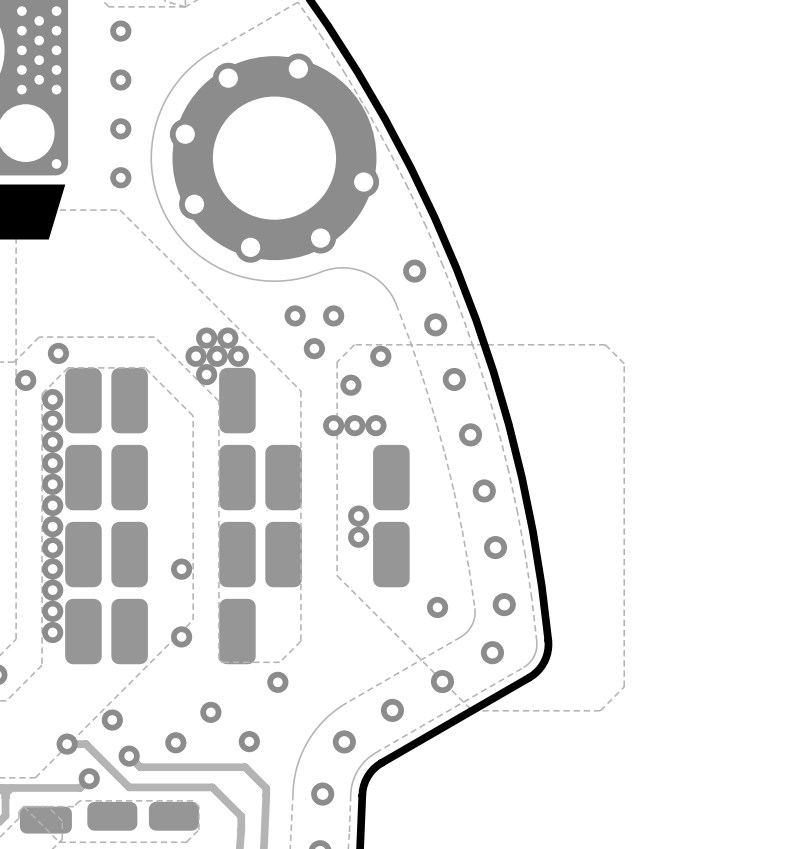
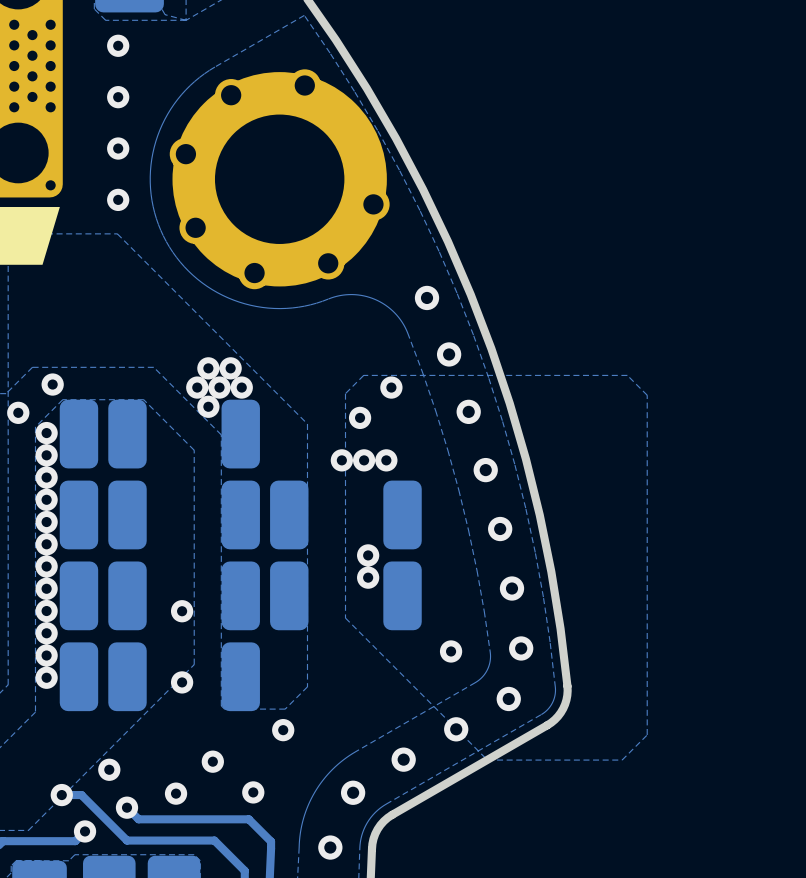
via: (295, 315) -> none
via: (333, 315) -> none
via: (314, 348) -> none

